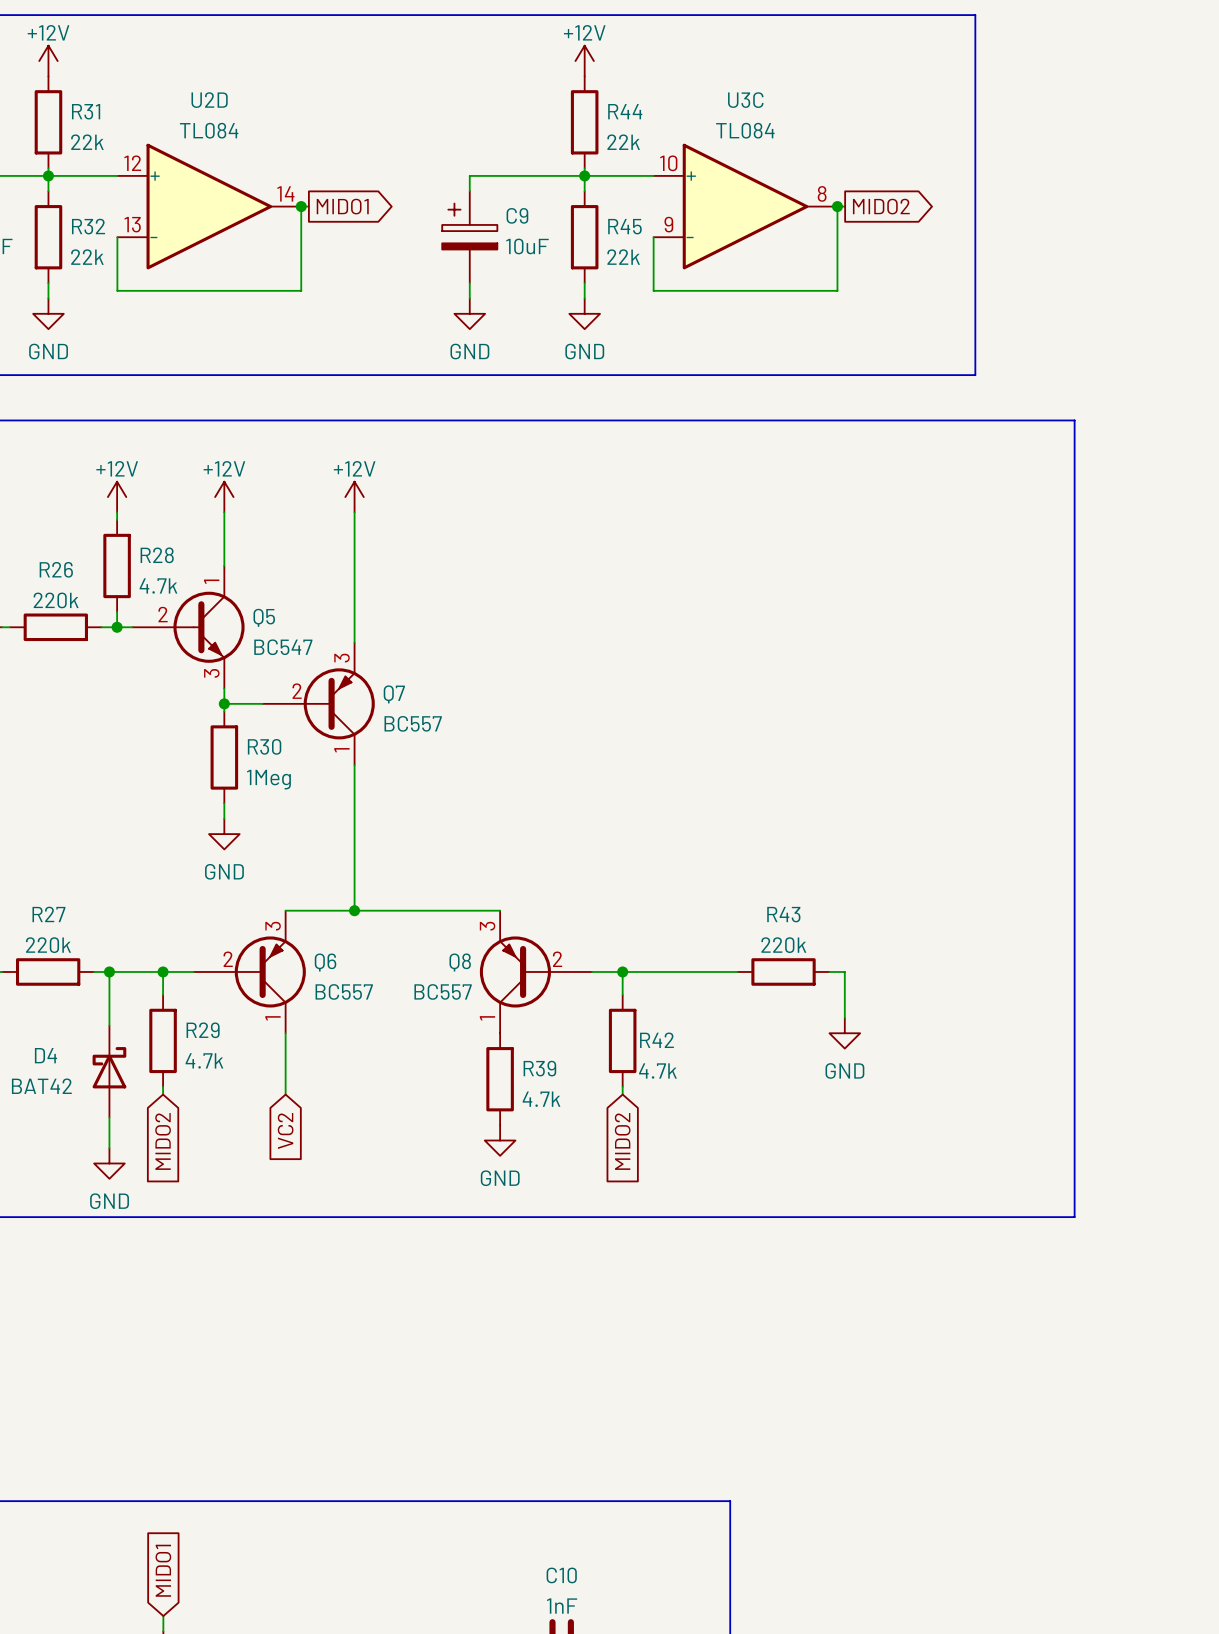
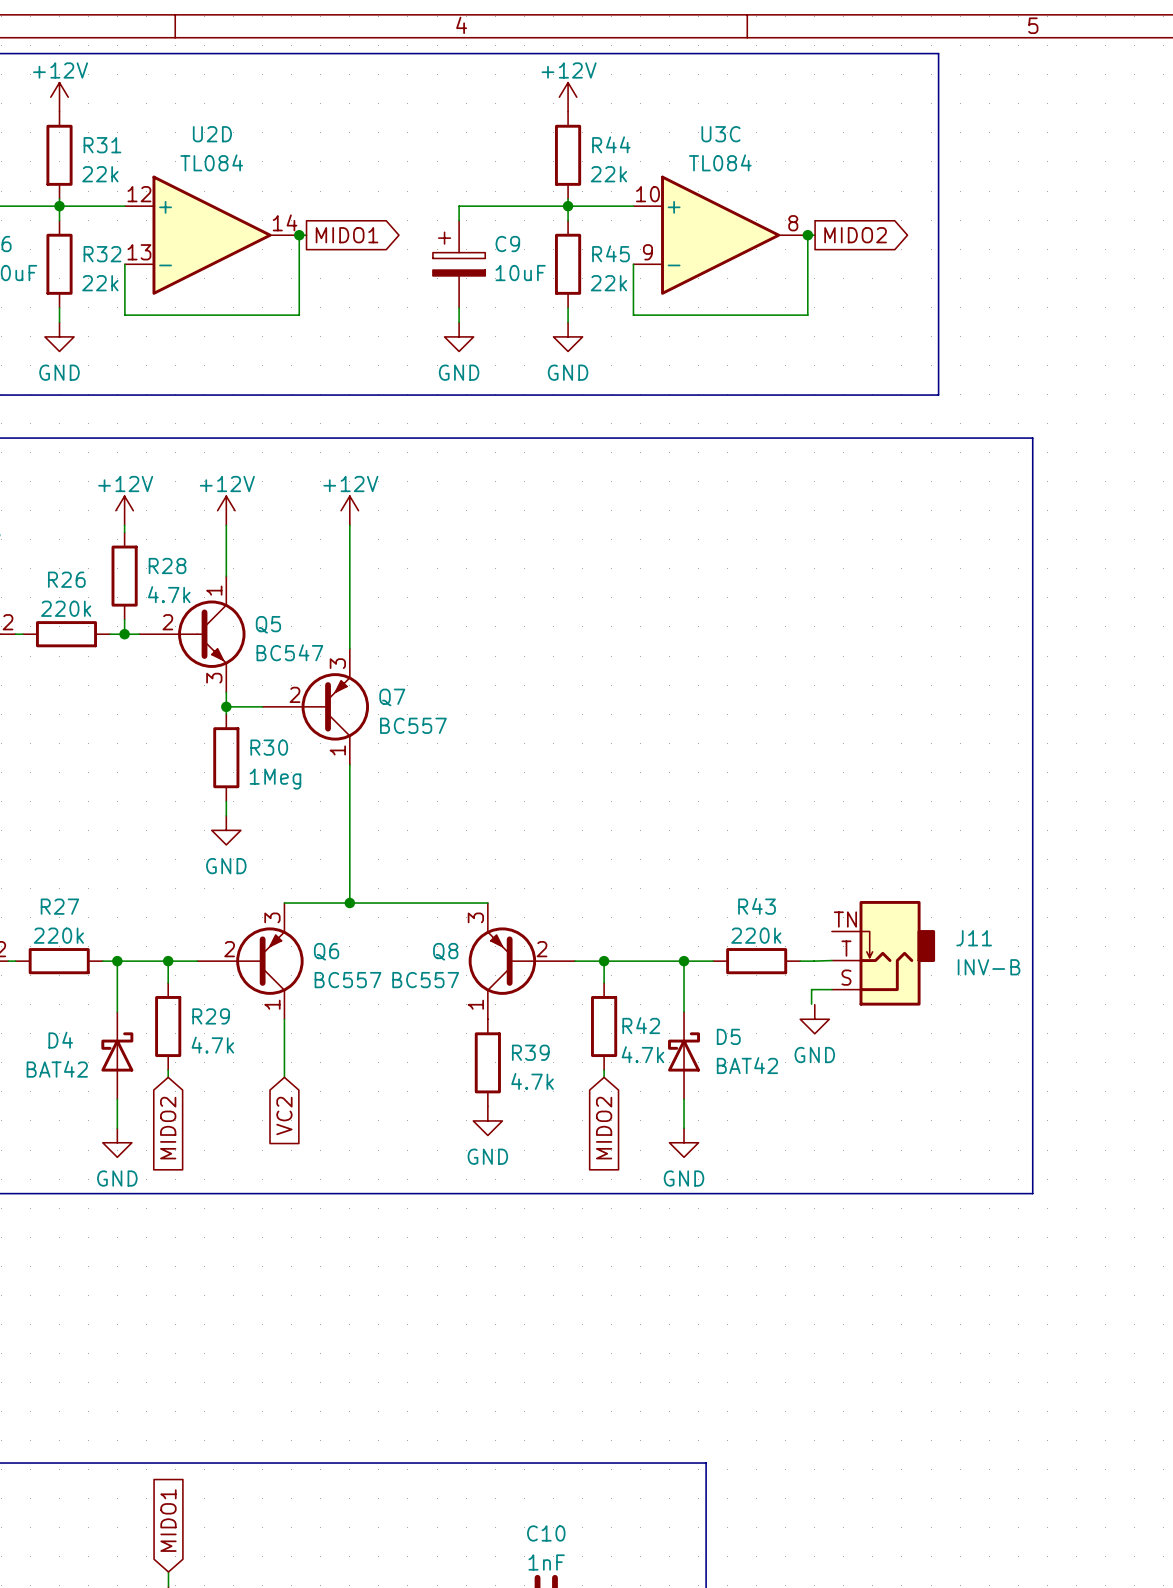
J11: none -> INV-B (883, 953)
wire: none -> (684, 961) (684, 1011)
junction: none -> (684, 961)
wire: (843, 971) (844, 1017) -> (813, 961) (831, 960)
wire: none -> (831, 989) (811, 989) (811, 1004)
D5: none -> BAT42 (684, 1055)
wire: none -> (684, 1099) (684, 1128)
power symbol: none -> GND (684, 1142)

